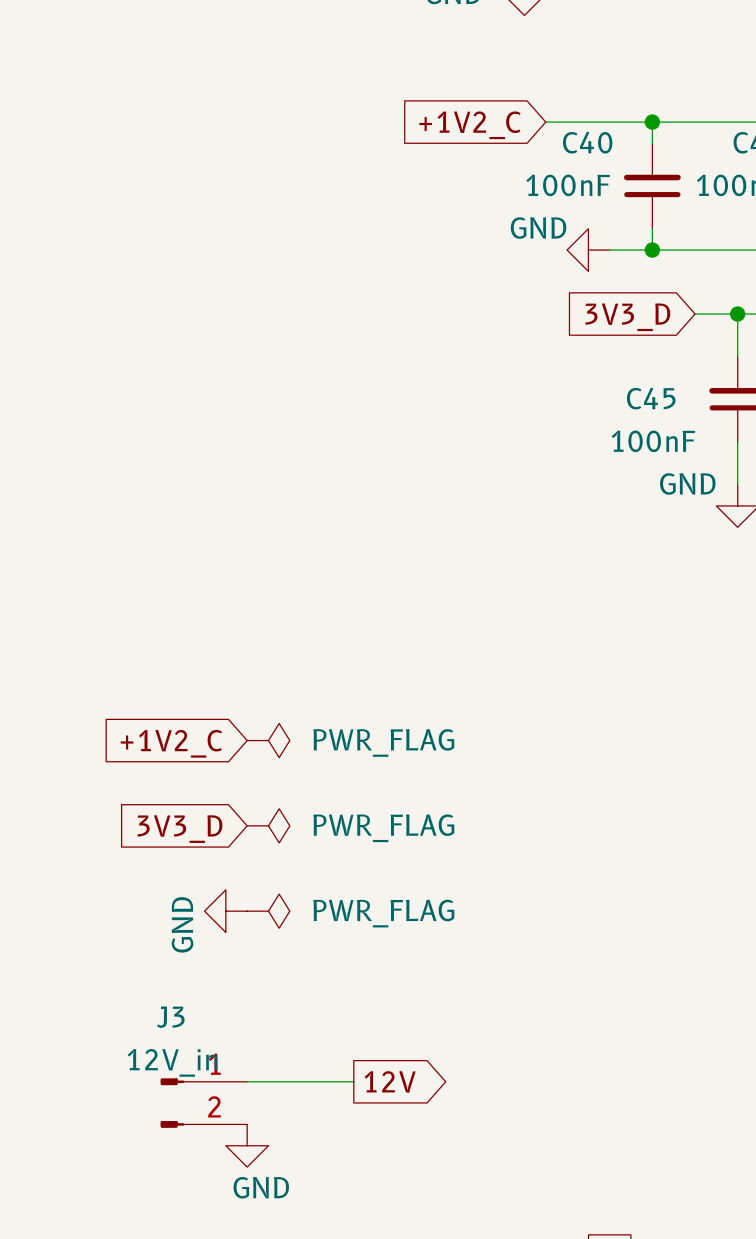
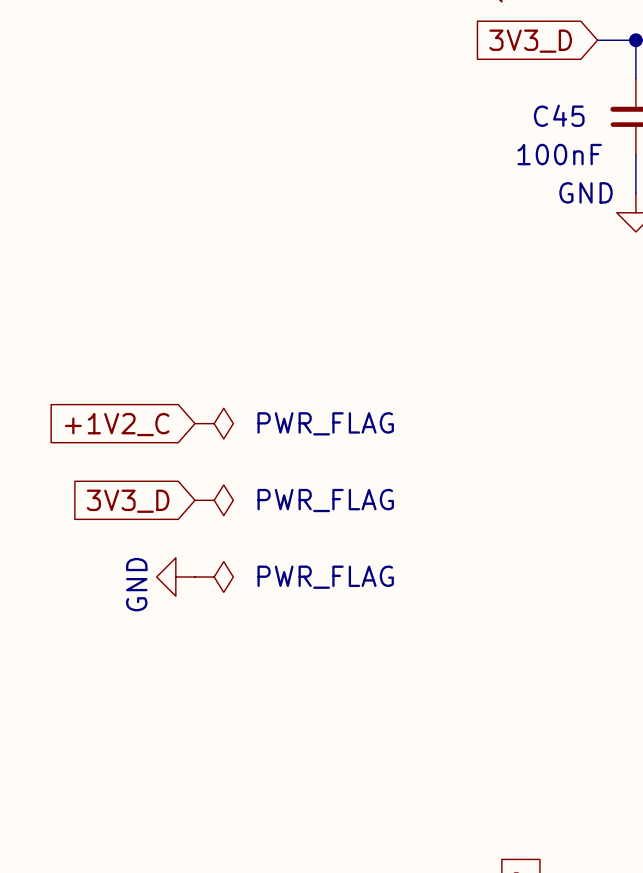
wire: (247, 1081) (353, 1081) -> none
global label: 12V (390, 1081) -> none
J3: 12V_in (203, 1103) -> none
power symbol: GND (247, 1145) -> none

